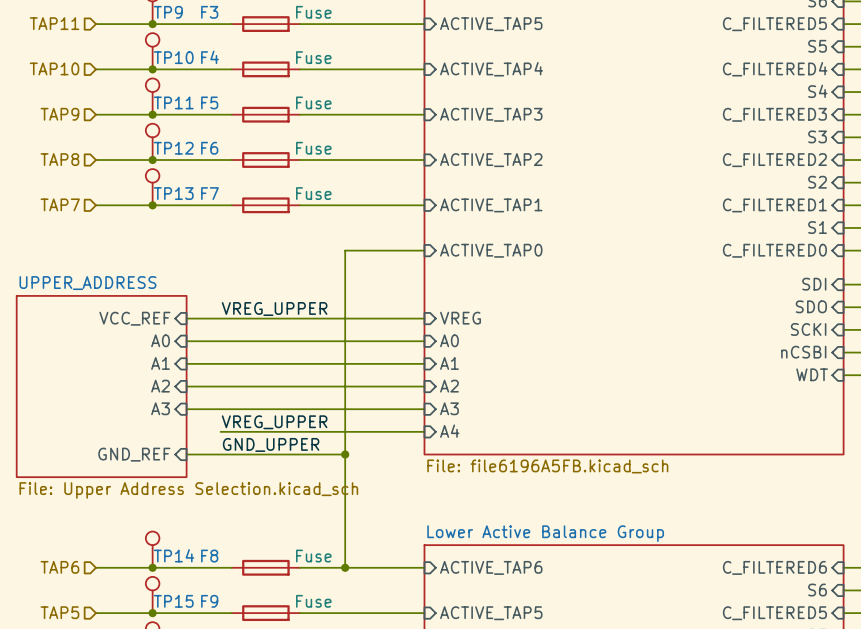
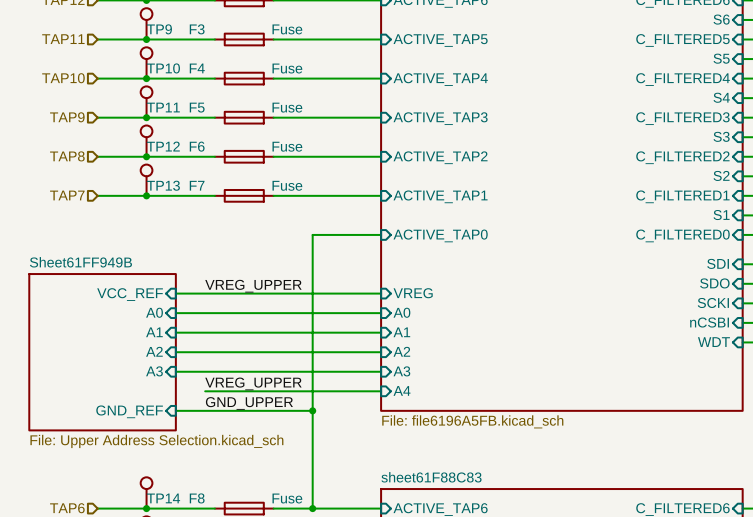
sheet UPPER_ADDRESS name: UPPER_ADDRESS (87, 283) -> Sheet61FF949B (80, 262)
sheet Lower Active Balance Group name: Lower Active Balance Group (545, 533) -> sheet61F88C83 (431, 477)

